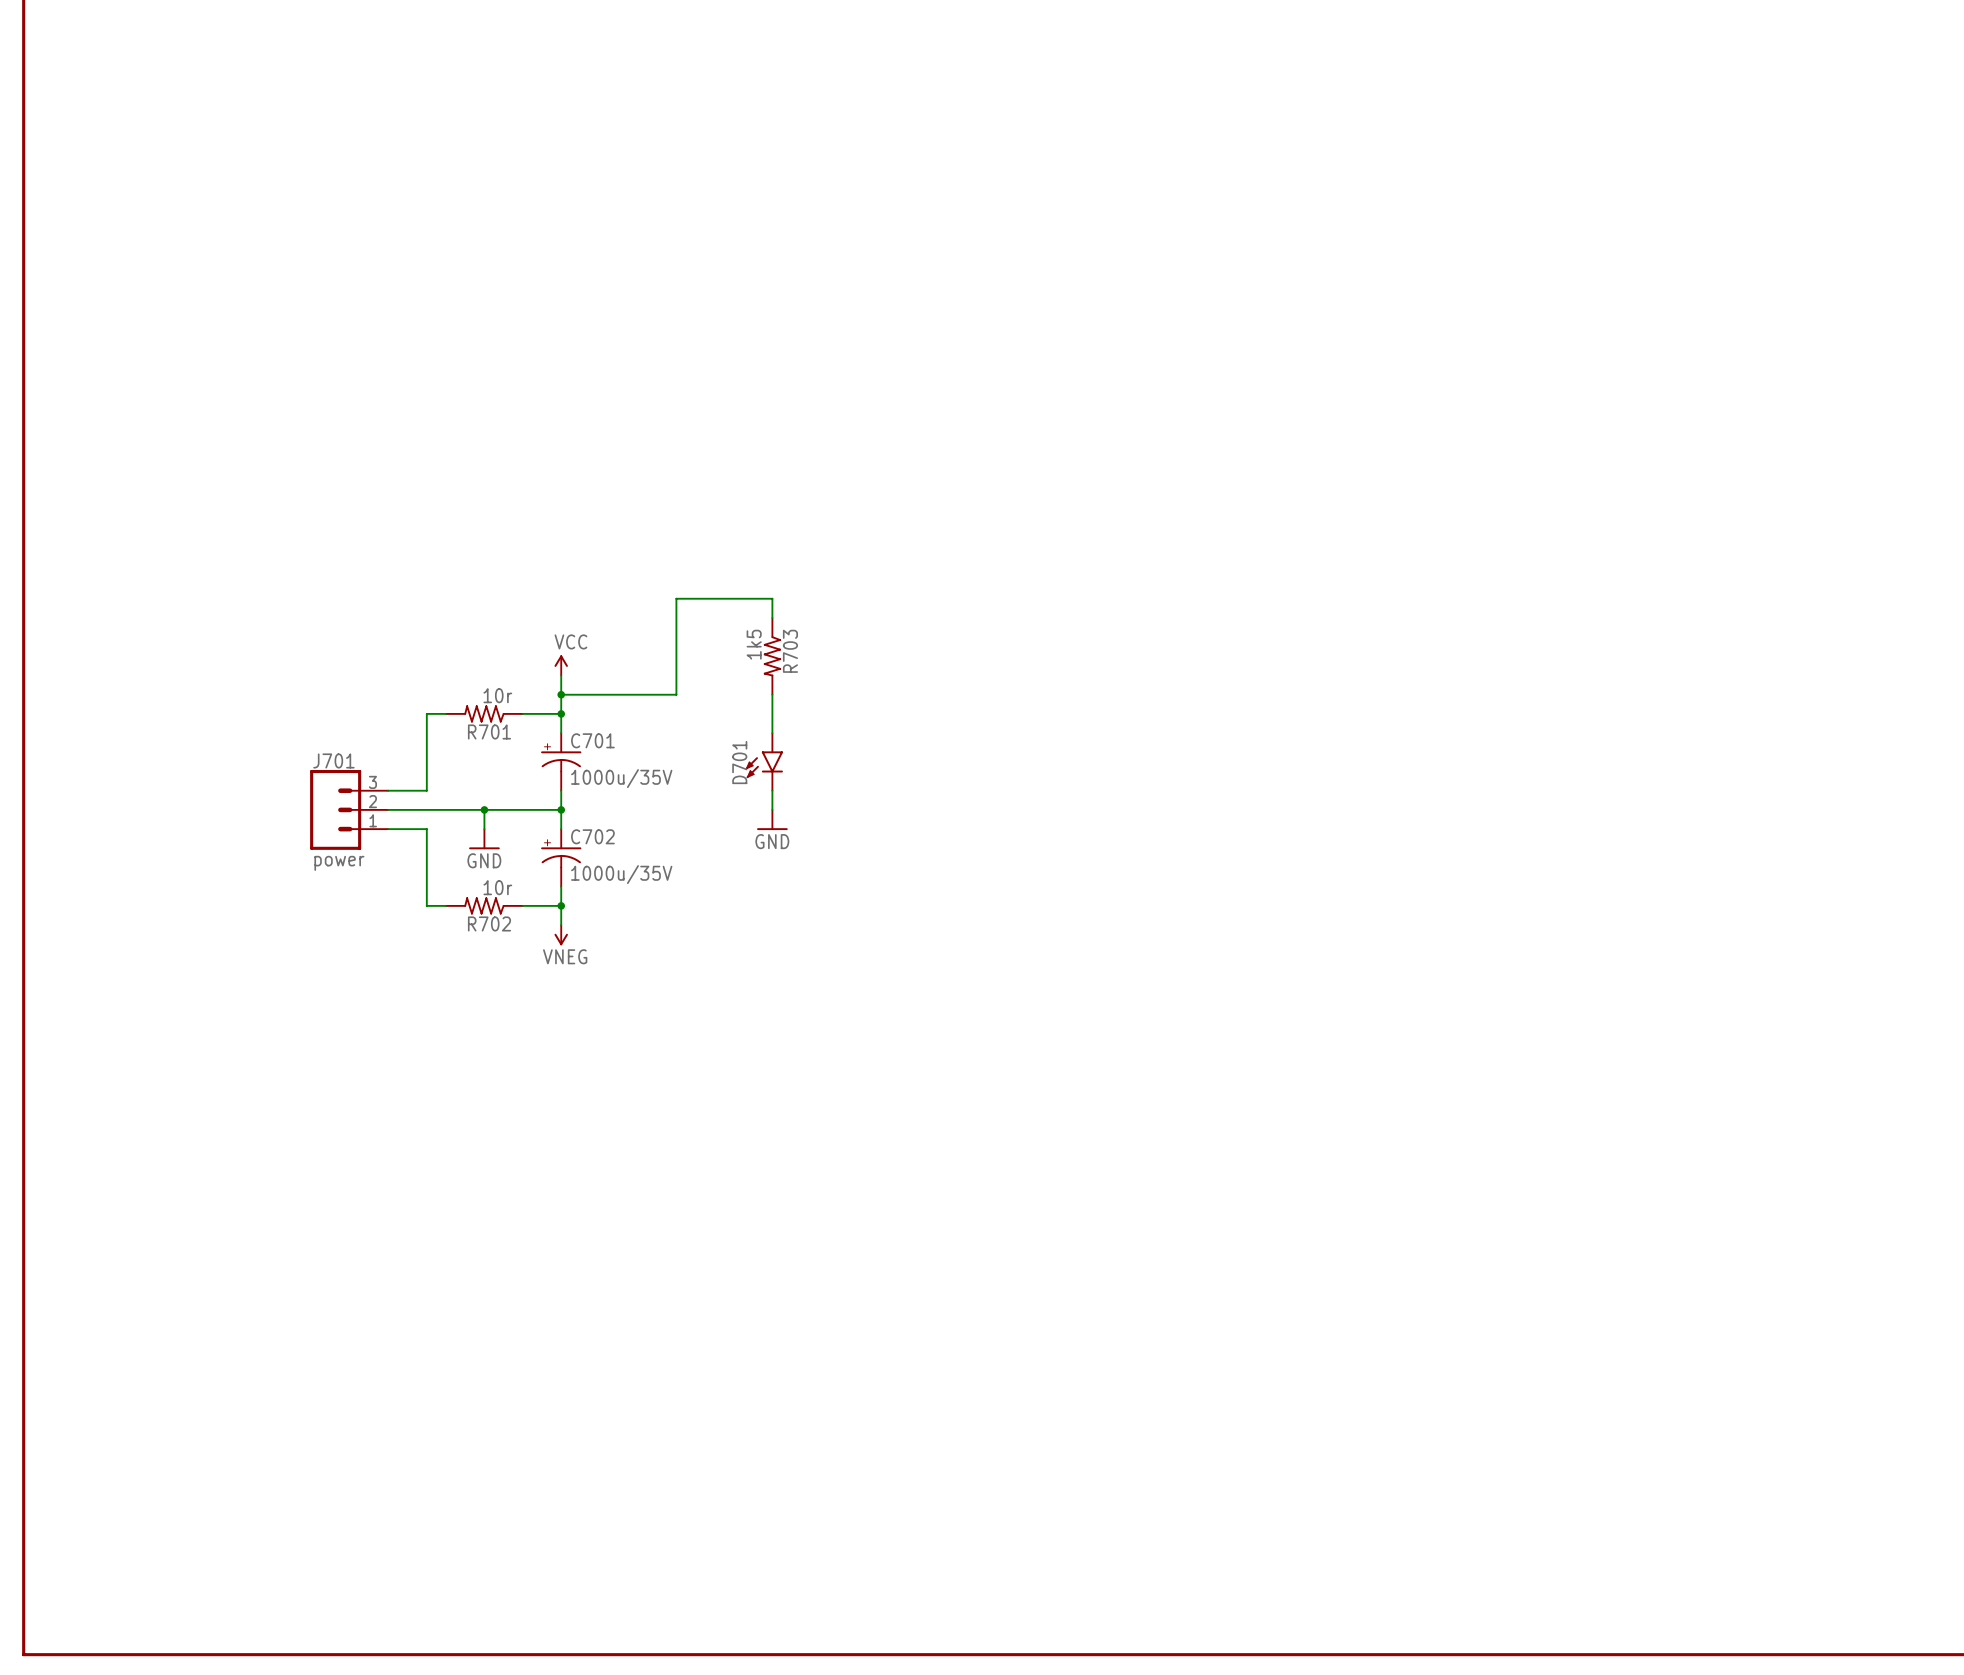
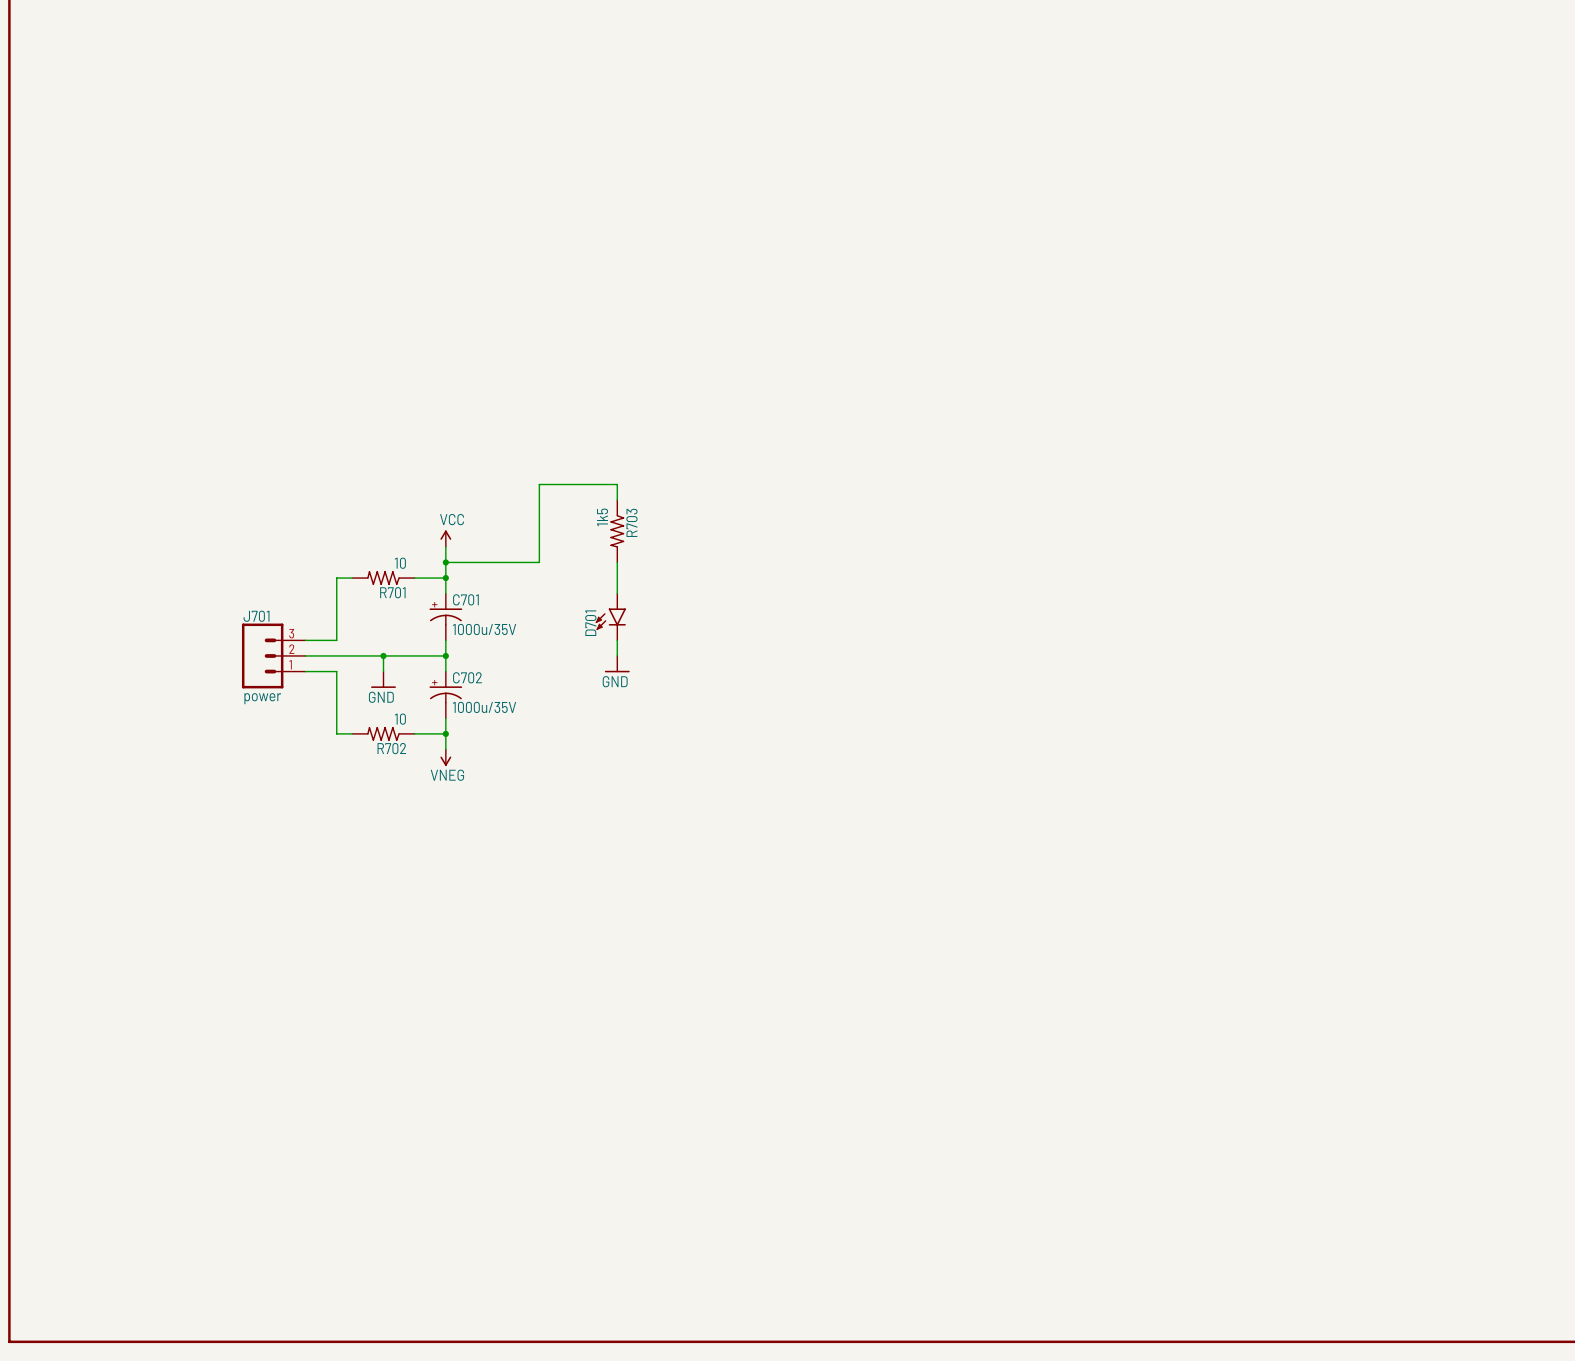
R701 value: 10r (497, 695) -> 10 (400, 563)
R702 value: 10r (497, 887) -> 10 (400, 719)

